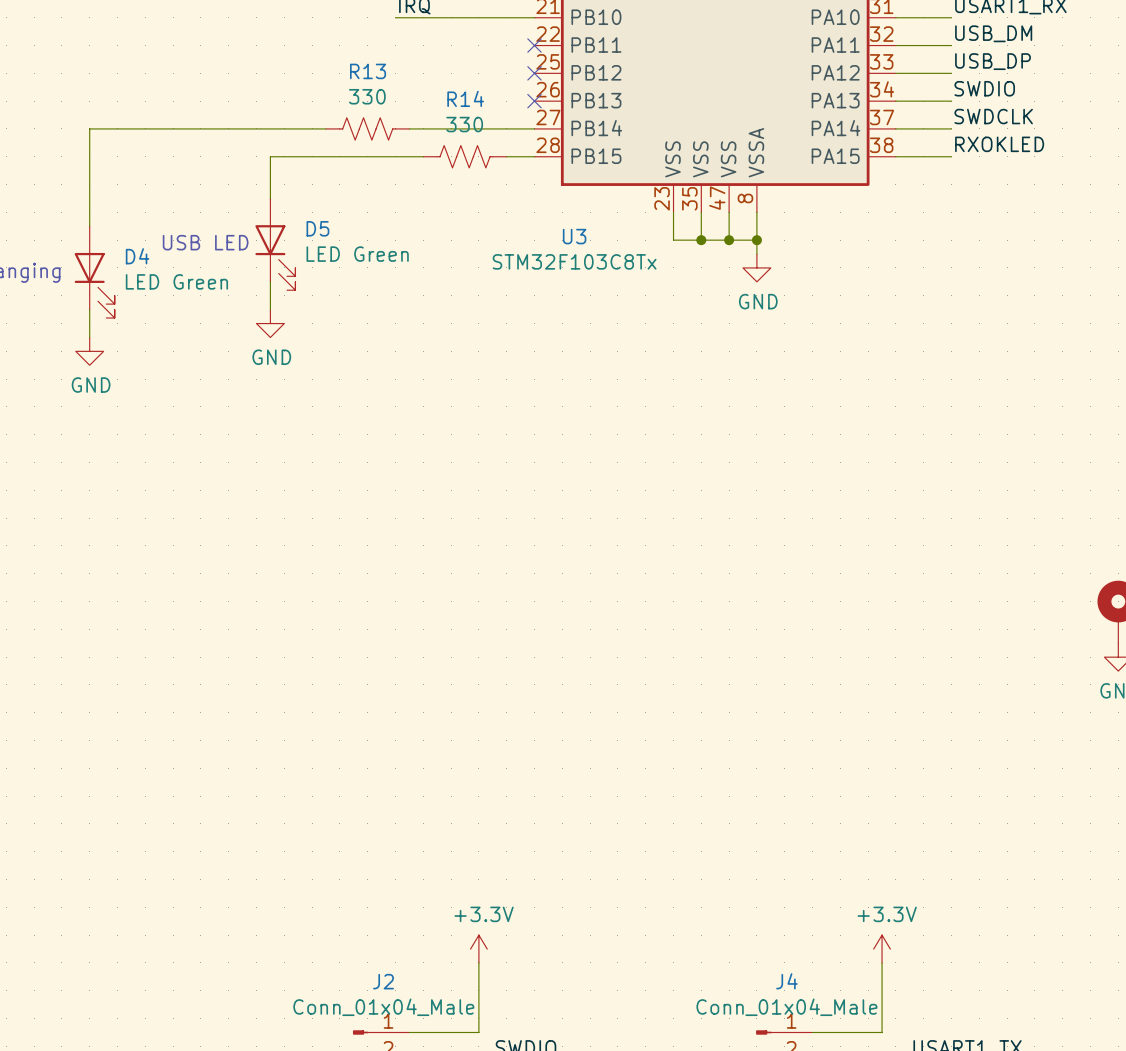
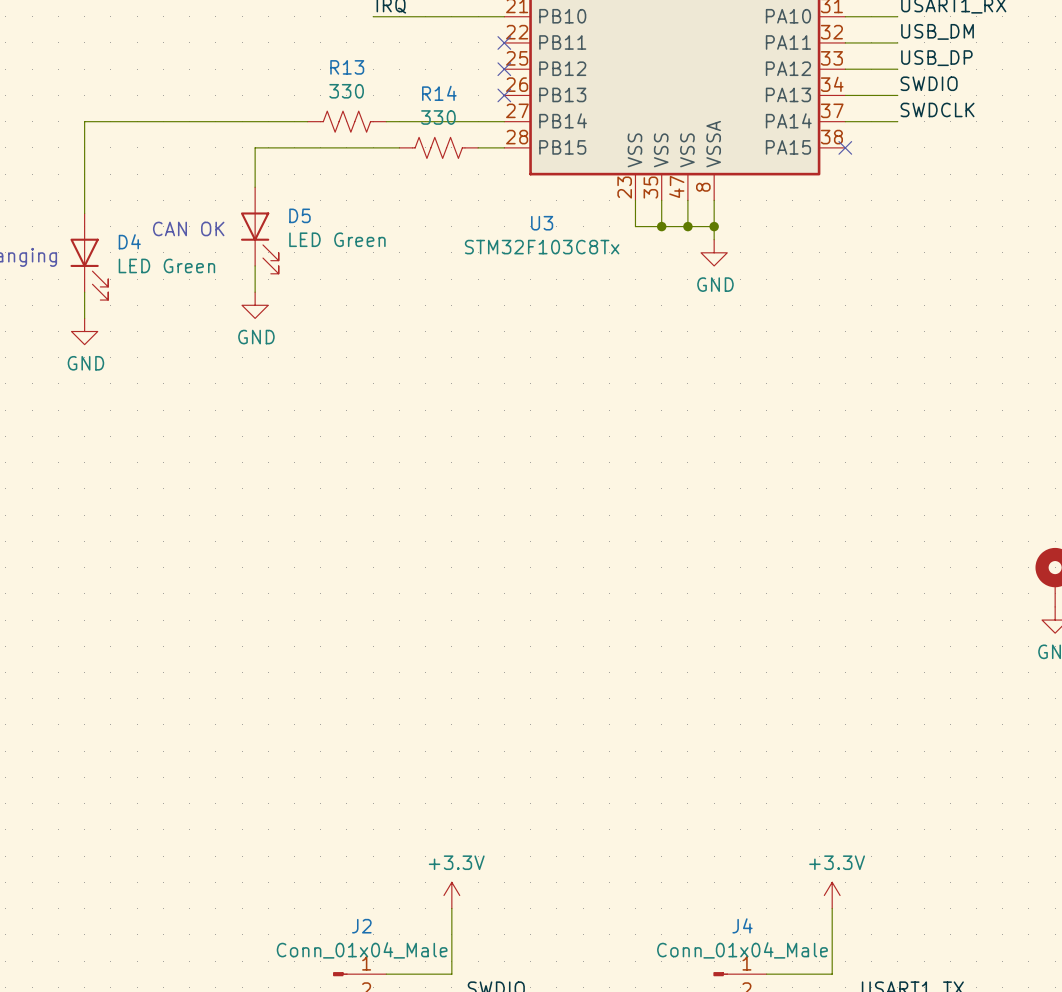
label: RXOKLED (999, 144) -> none
wire: (895, 156) (951, 156) -> none
no-connect mark: none -> (845, 147)
text: USB LED (205, 242) -> CAN OK (188, 228)

